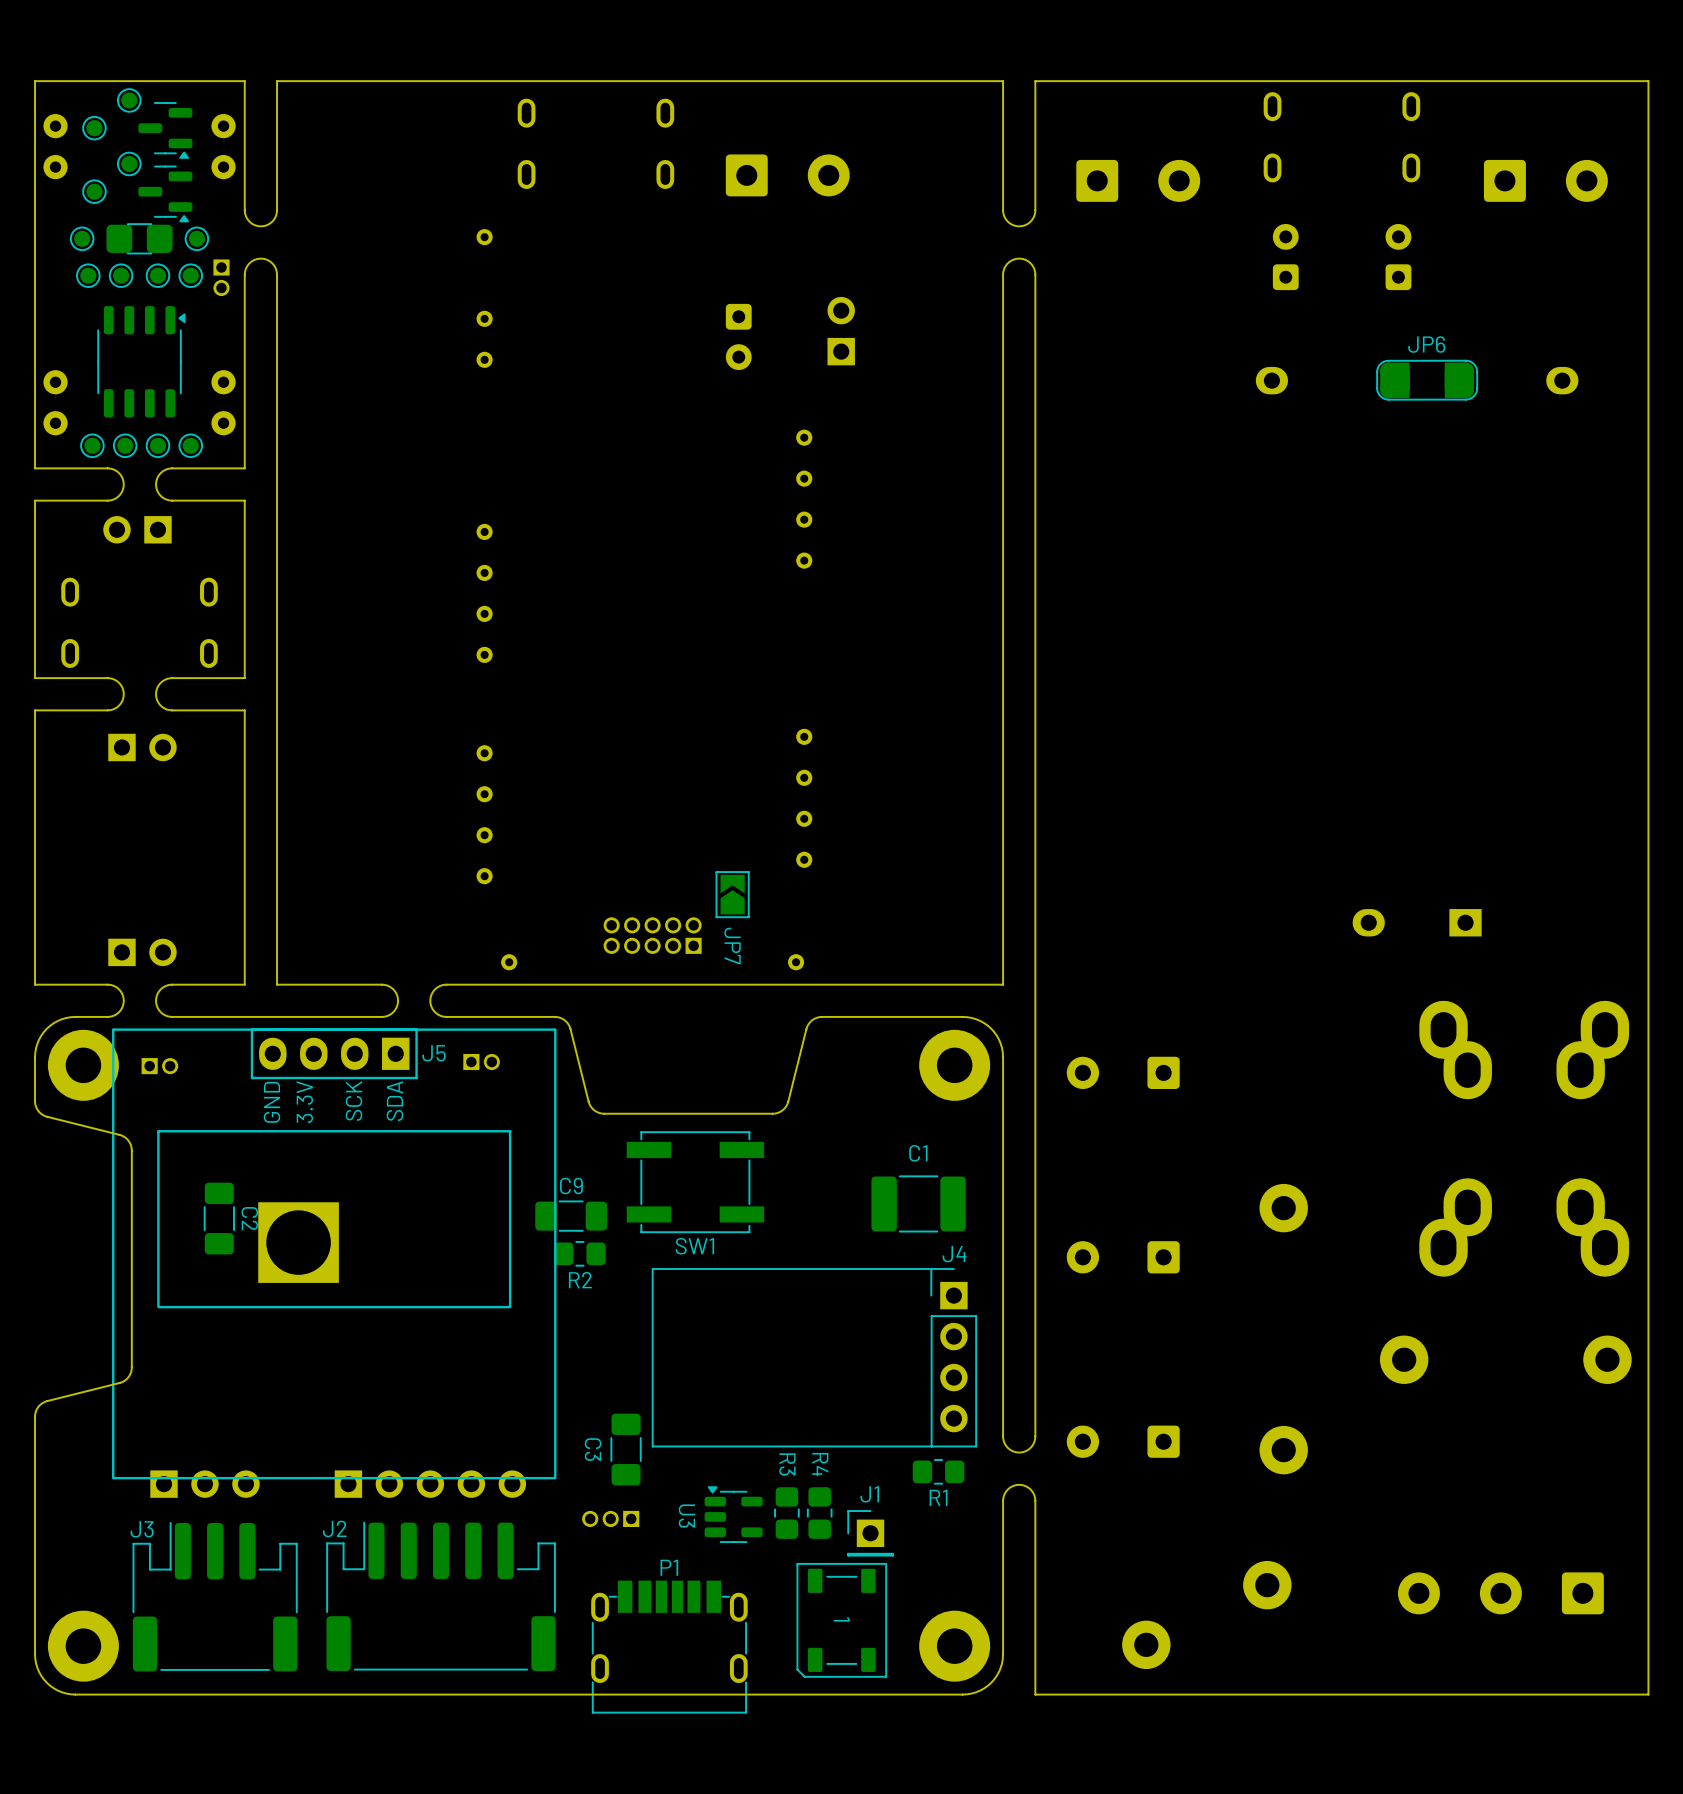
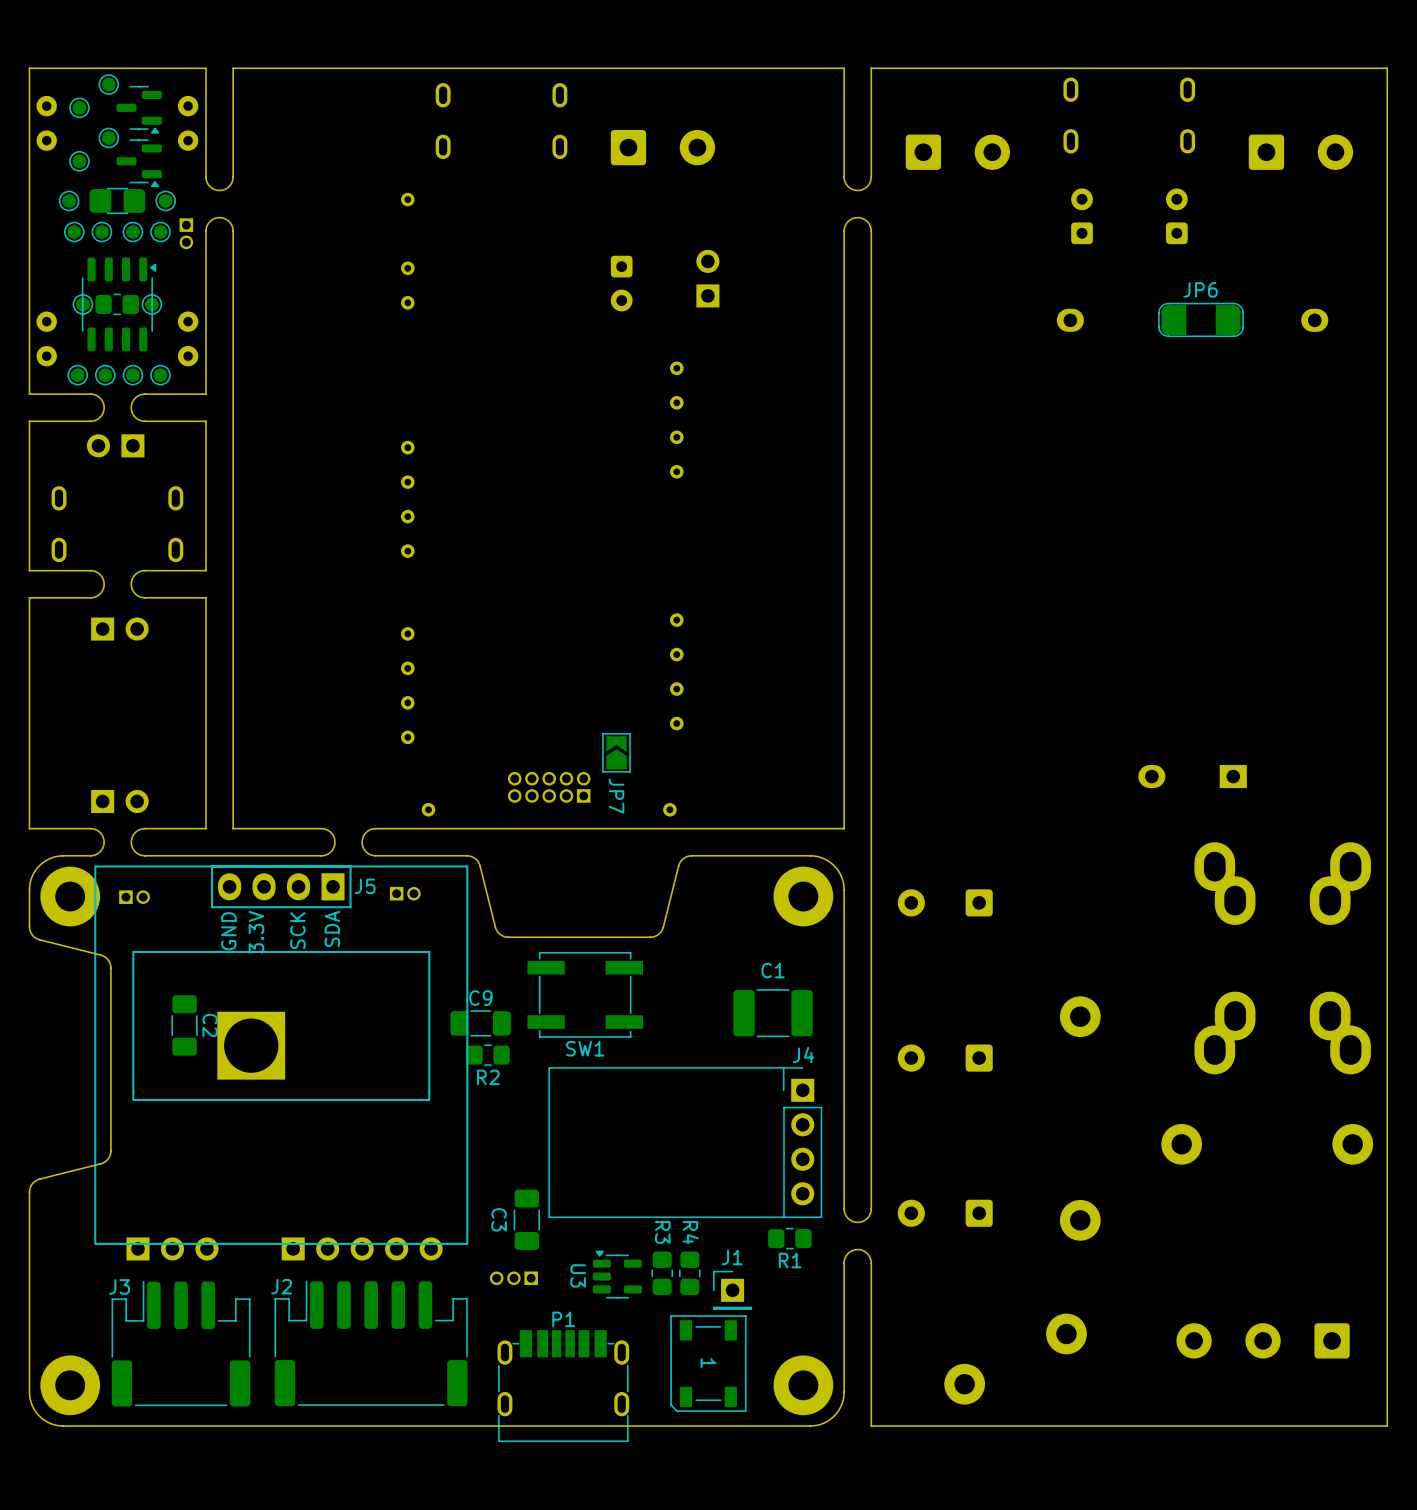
part: none -> (82, 304)
part: none -> (117, 304)
part: none -> (151, 304)

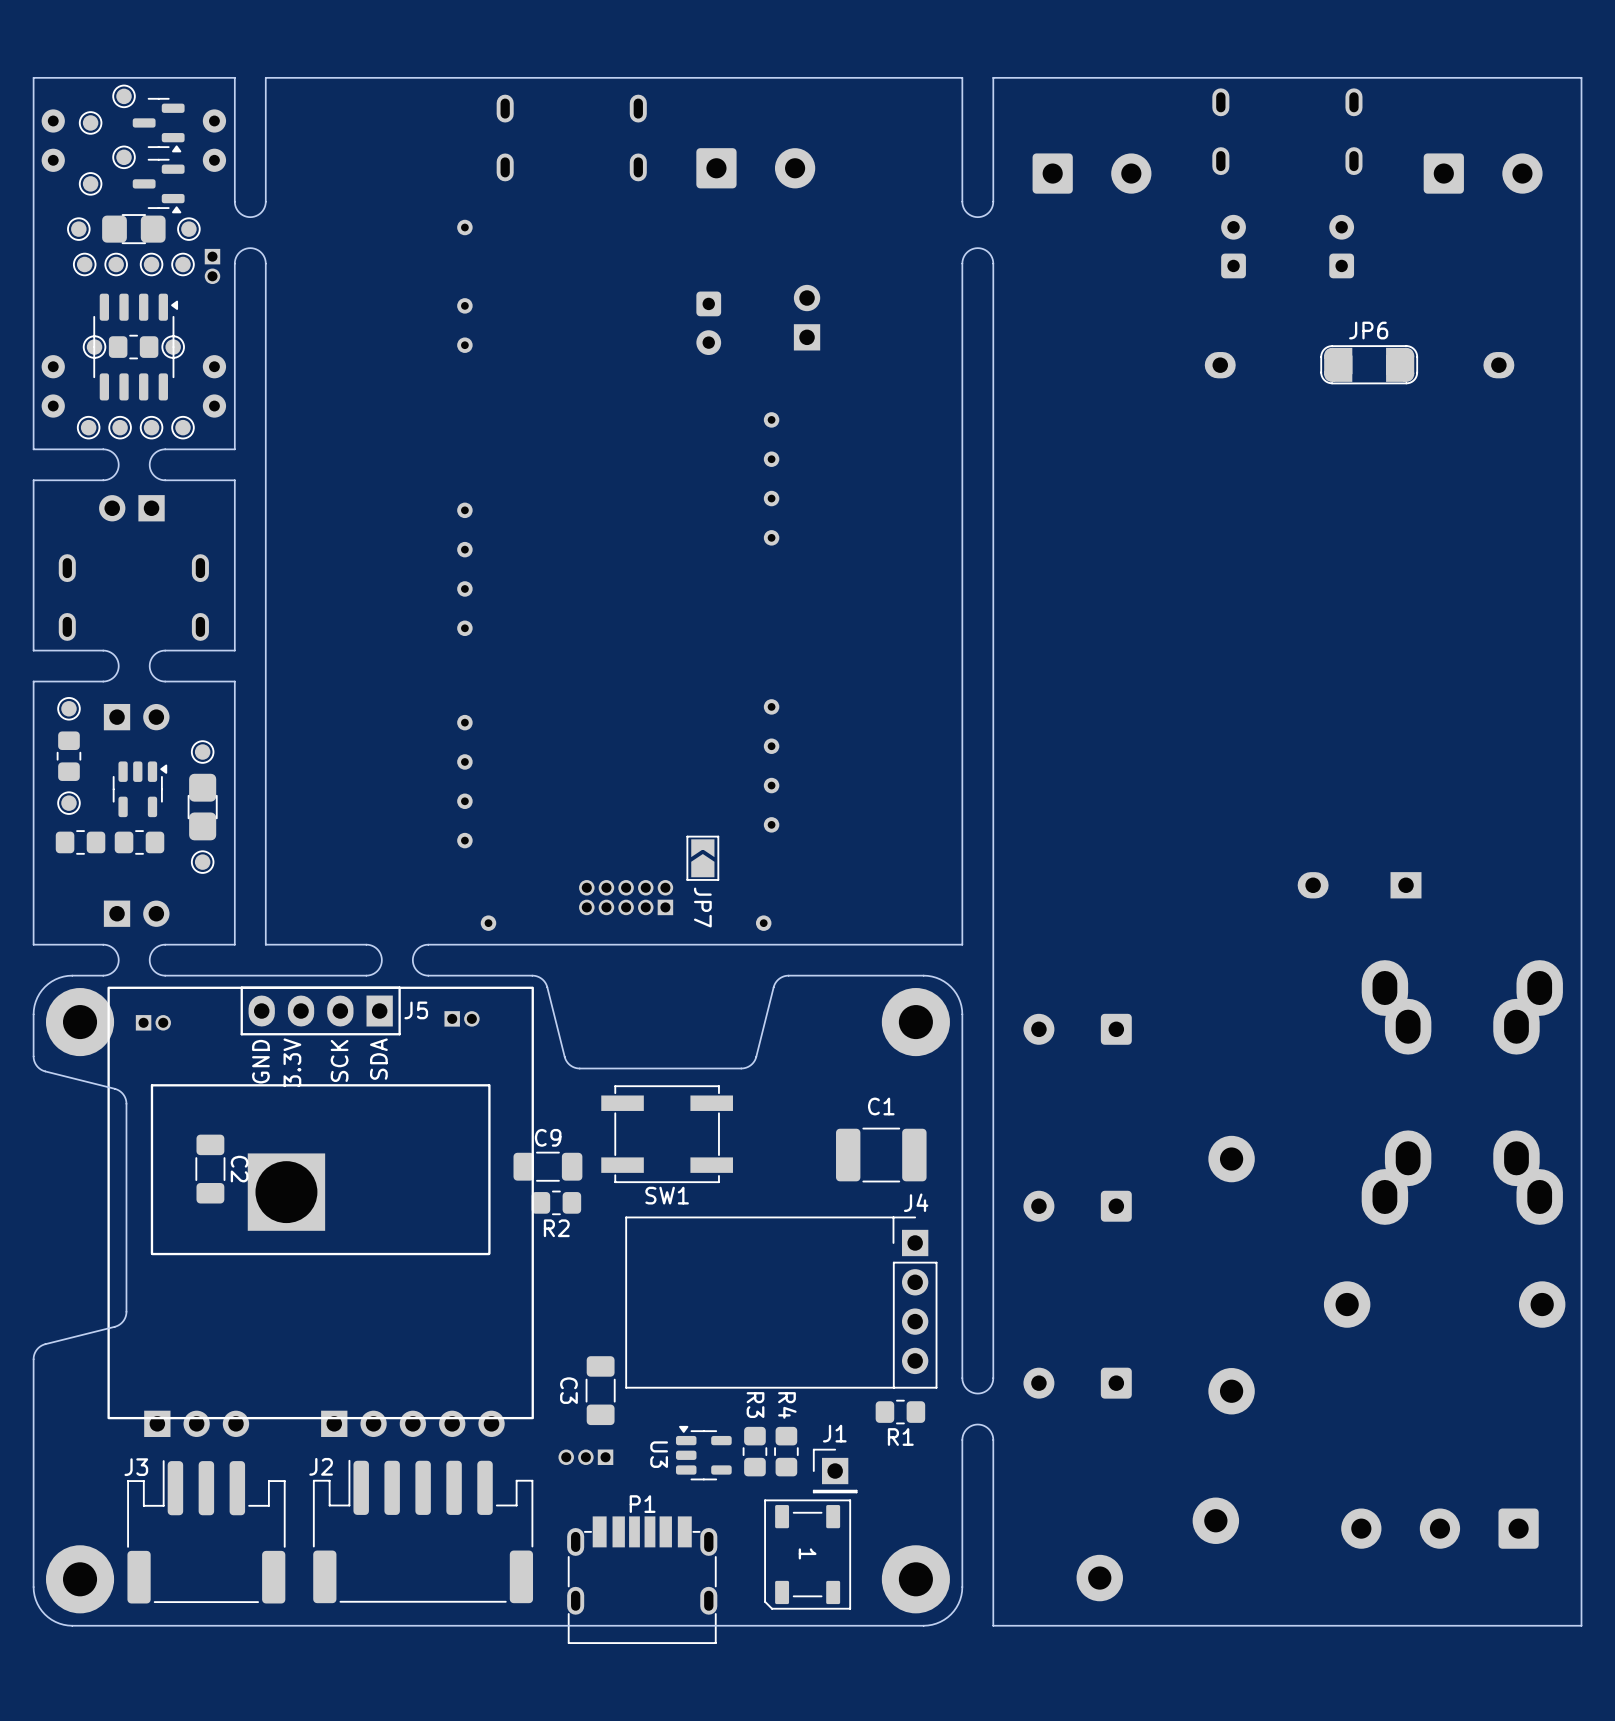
part: none -> (68, 708)
part: none -> (202, 752)
part: none -> (68, 756)
part: none -> (139, 789)
part: none -> (68, 803)
part: none -> (202, 807)
part: none -> (80, 842)
part: none -> (139, 842)
part: none -> (202, 862)

